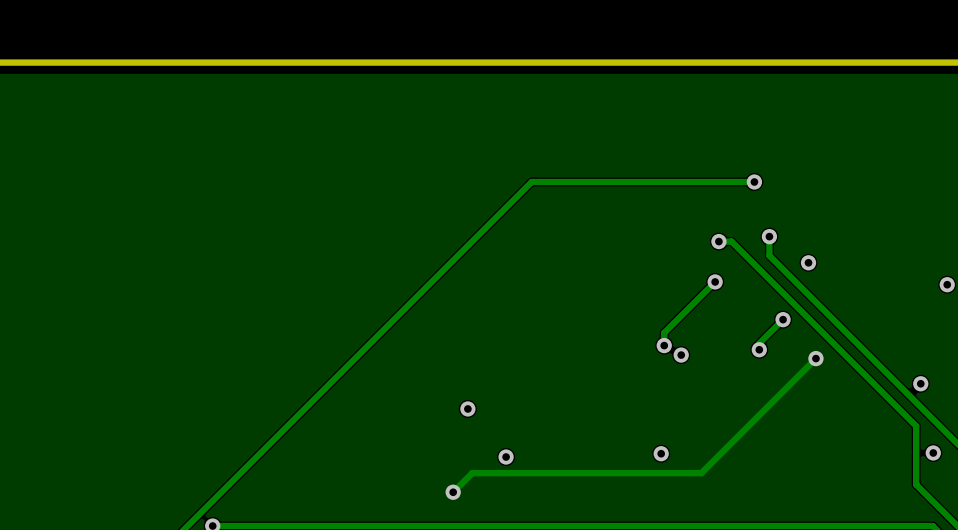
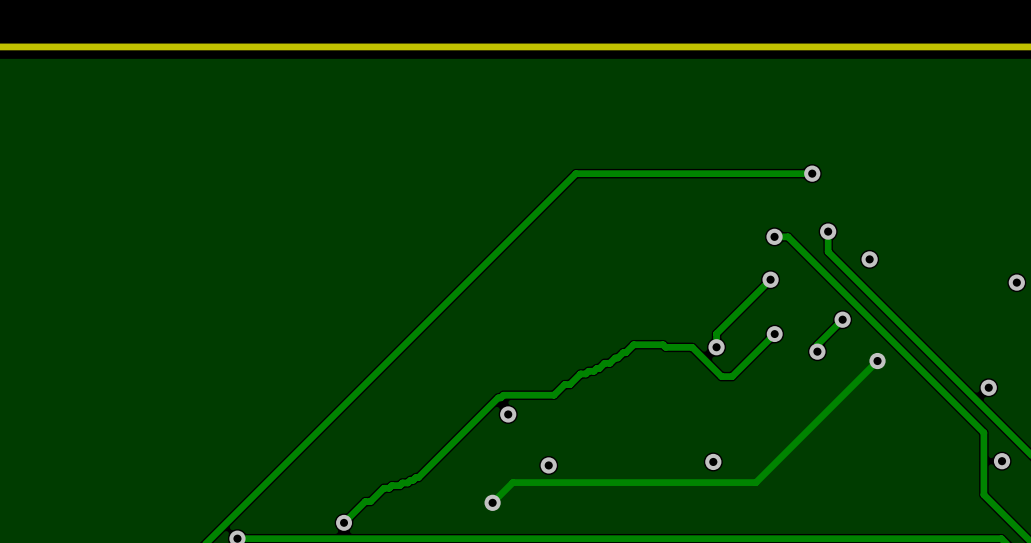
track: none -> (774, 334) (732, 376) (721, 376) (692, 347) (633, 344) (609, 363) (604, 363) (593, 371) (580, 373) (570, 384) (564, 384) (554, 395) (503, 395) (498, 397) (418, 477) (399, 485) (383, 488) (370, 501) (365, 501) (344, 522)
via position: (681, 355) -> (774, 334)
via: none -> (344, 522)

